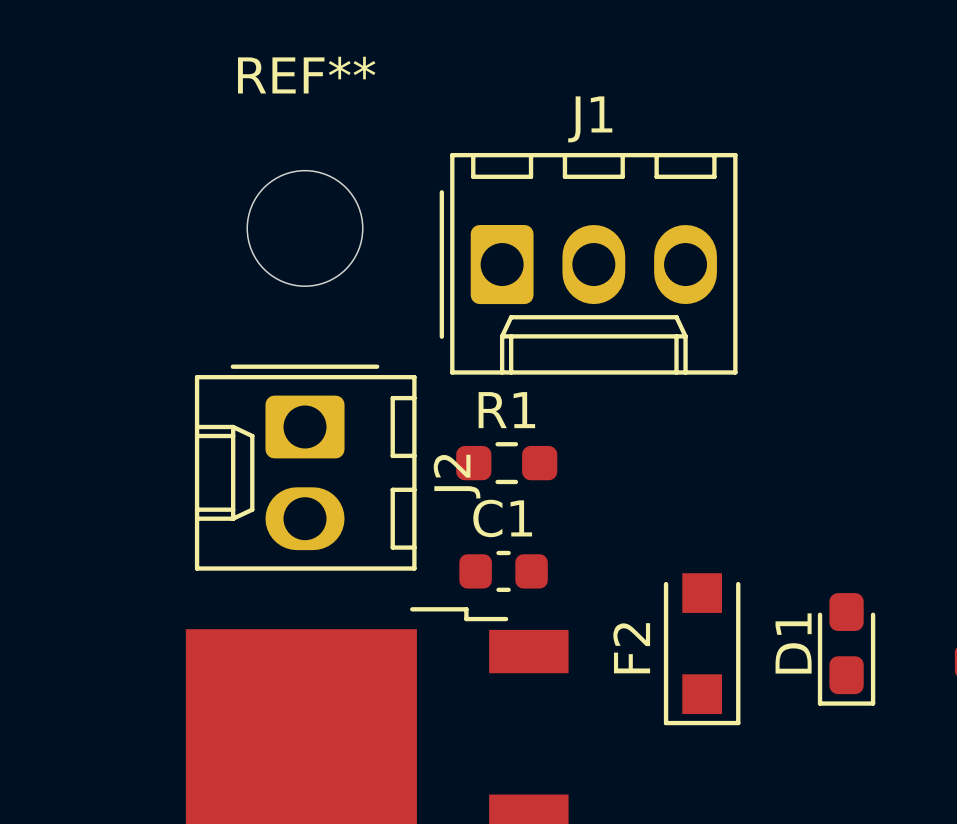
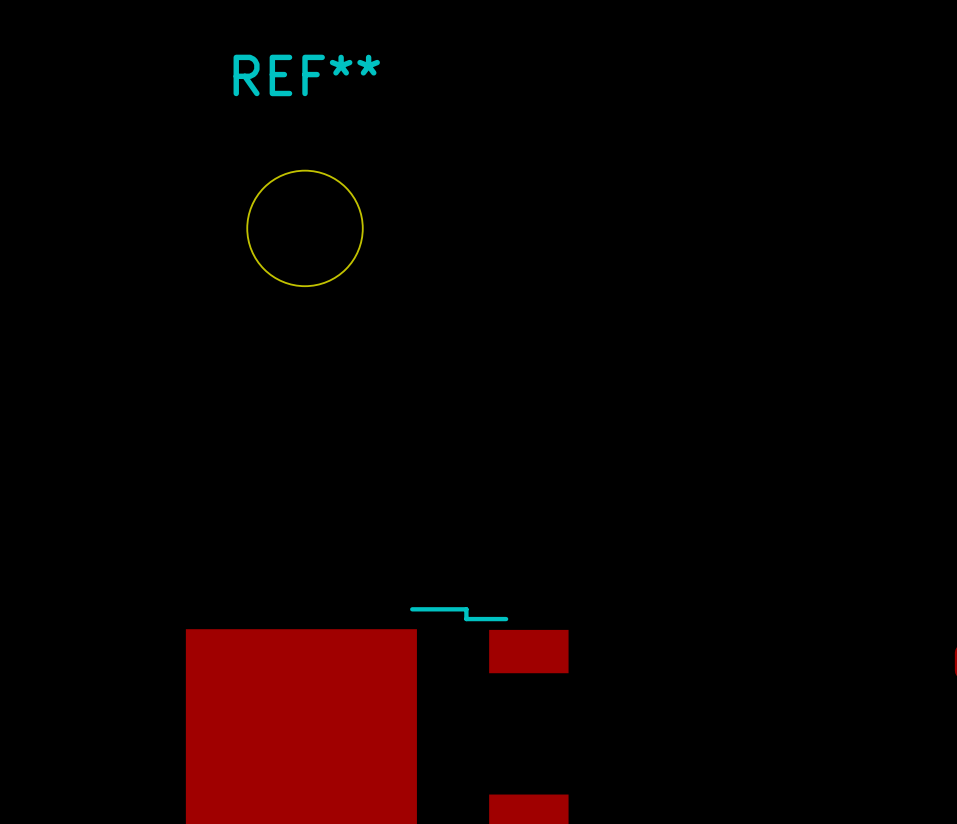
J1: (588, 263) -> none
R1: (506, 463) -> none
J2: (305, 467) -> none
C1: (503, 571) -> none
F2: (702, 649) -> none
D1: (846, 649) -> none

